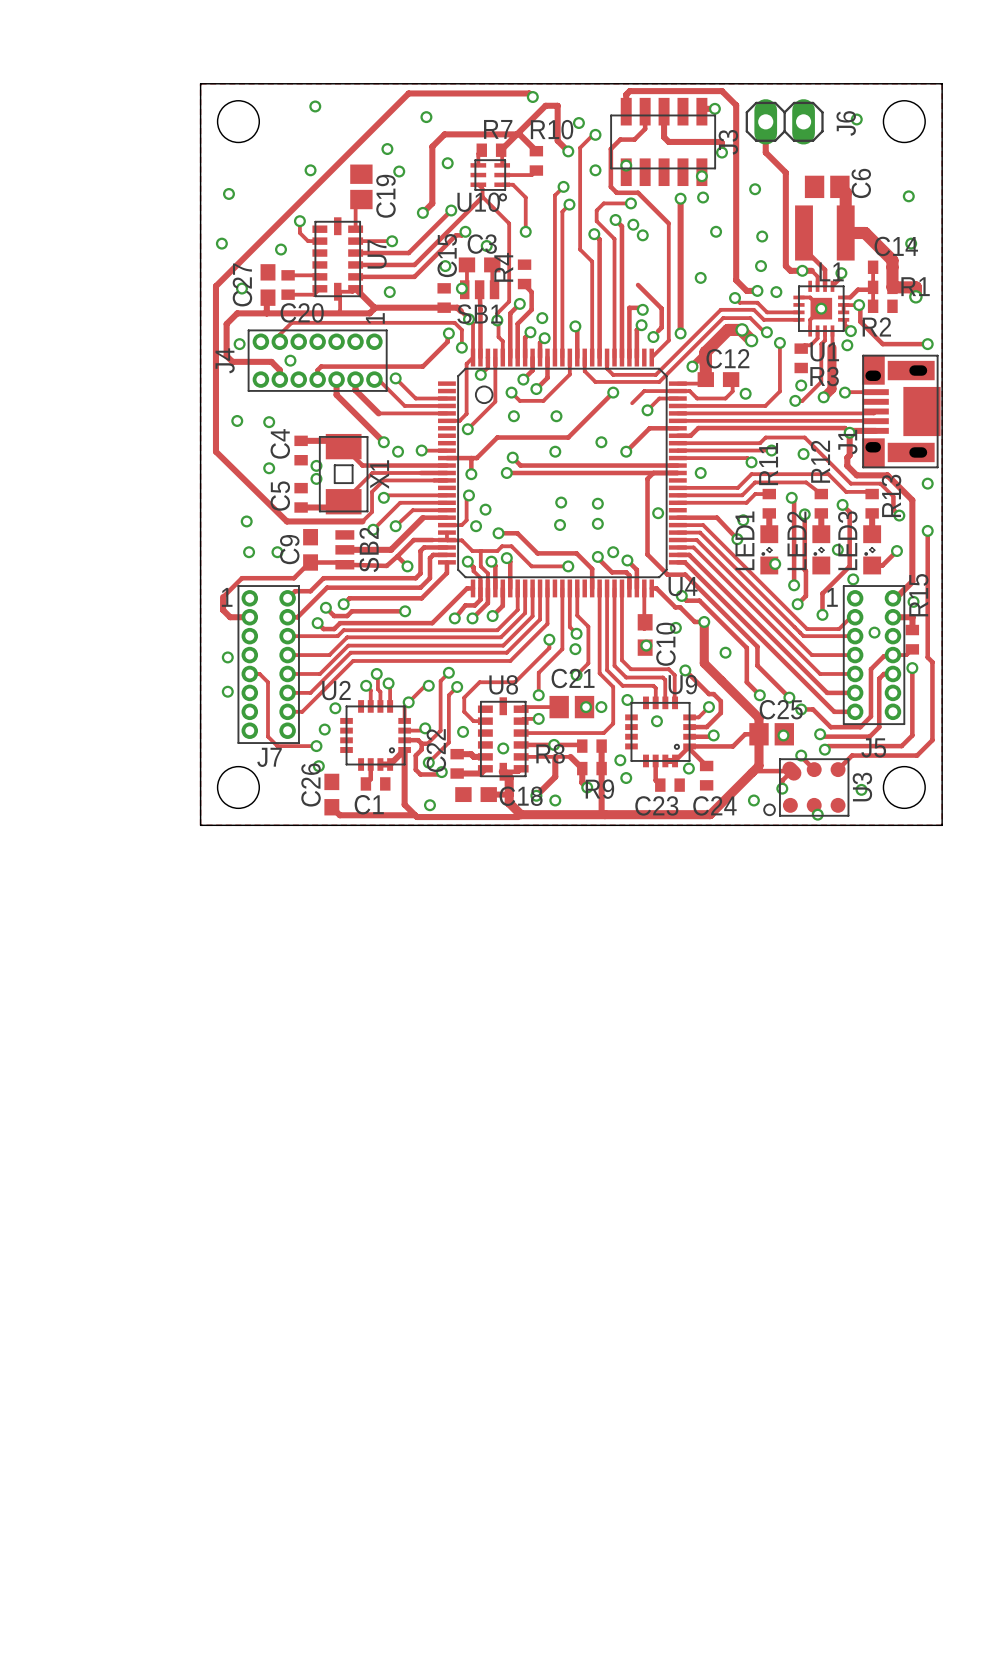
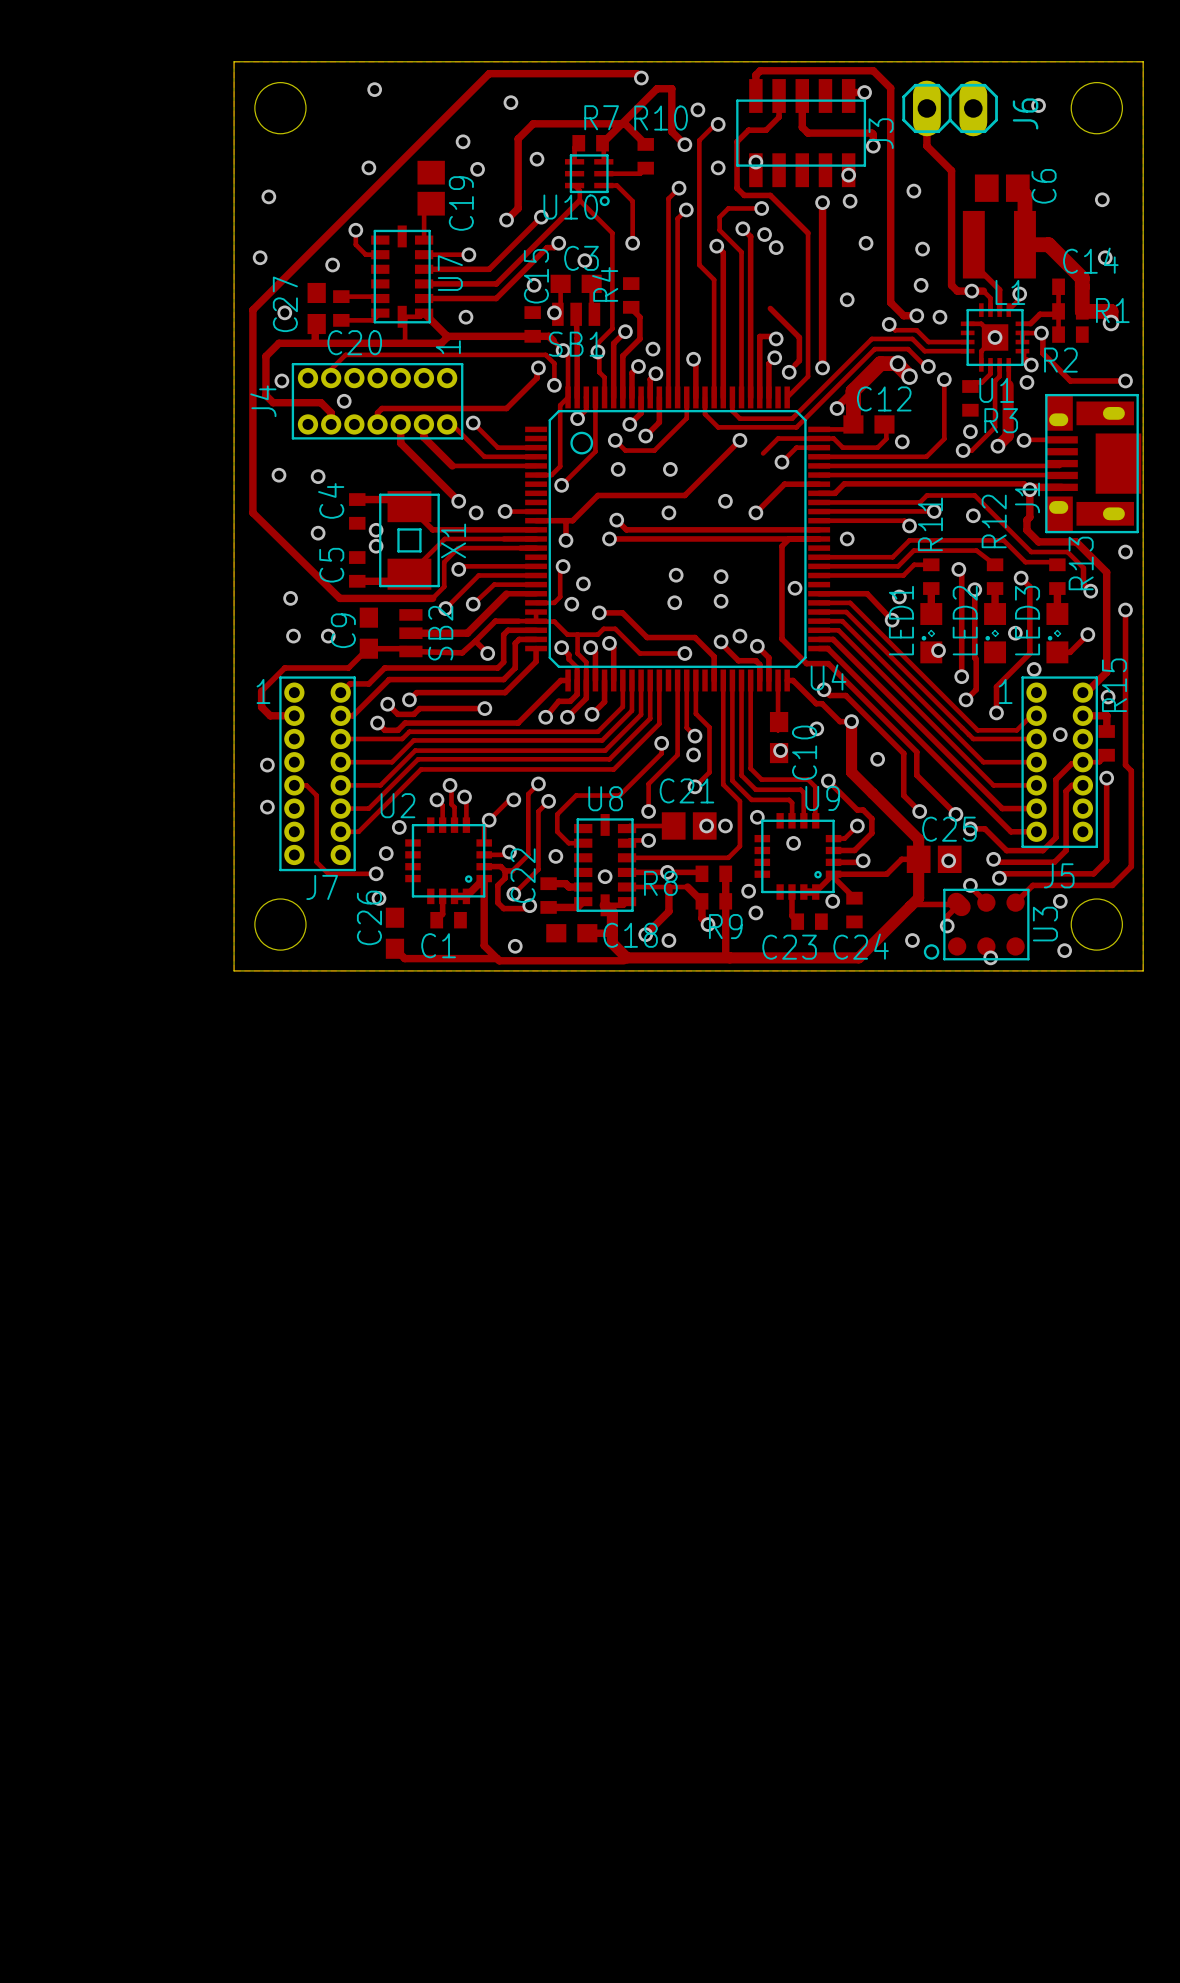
via: none -> (1060, 901)
via: (861, 789) -> none
via: none -> (1064, 950)

